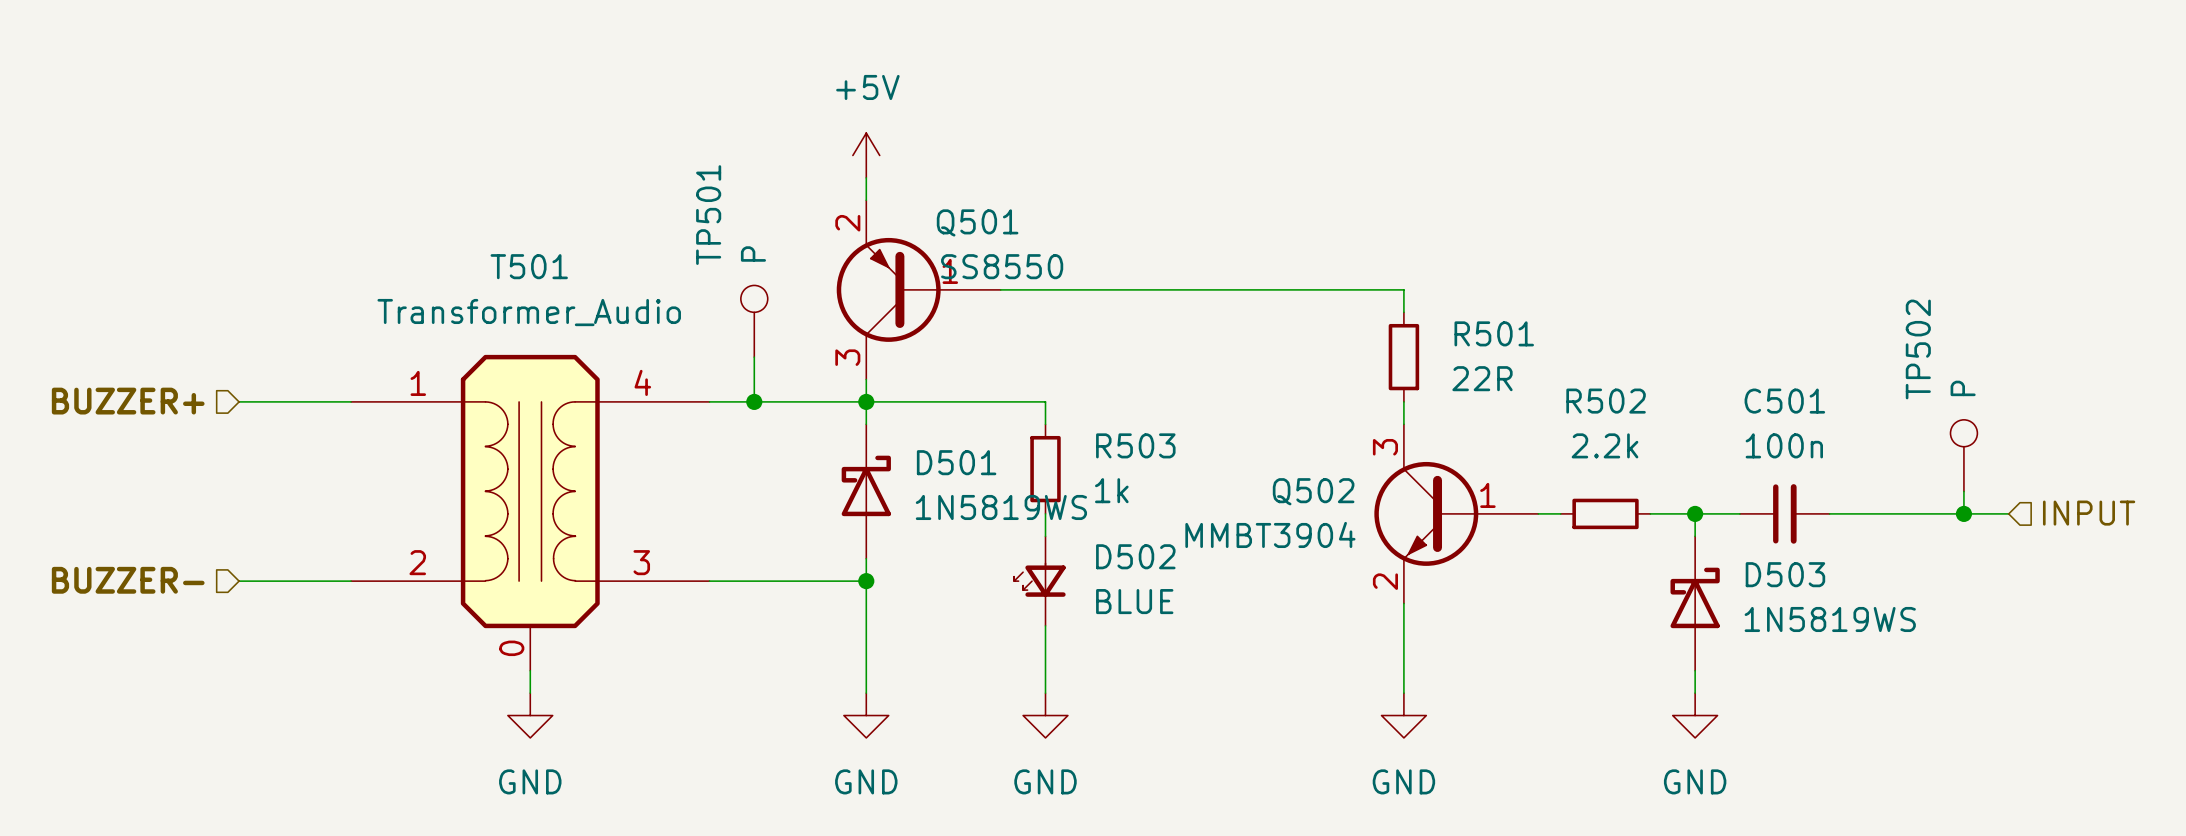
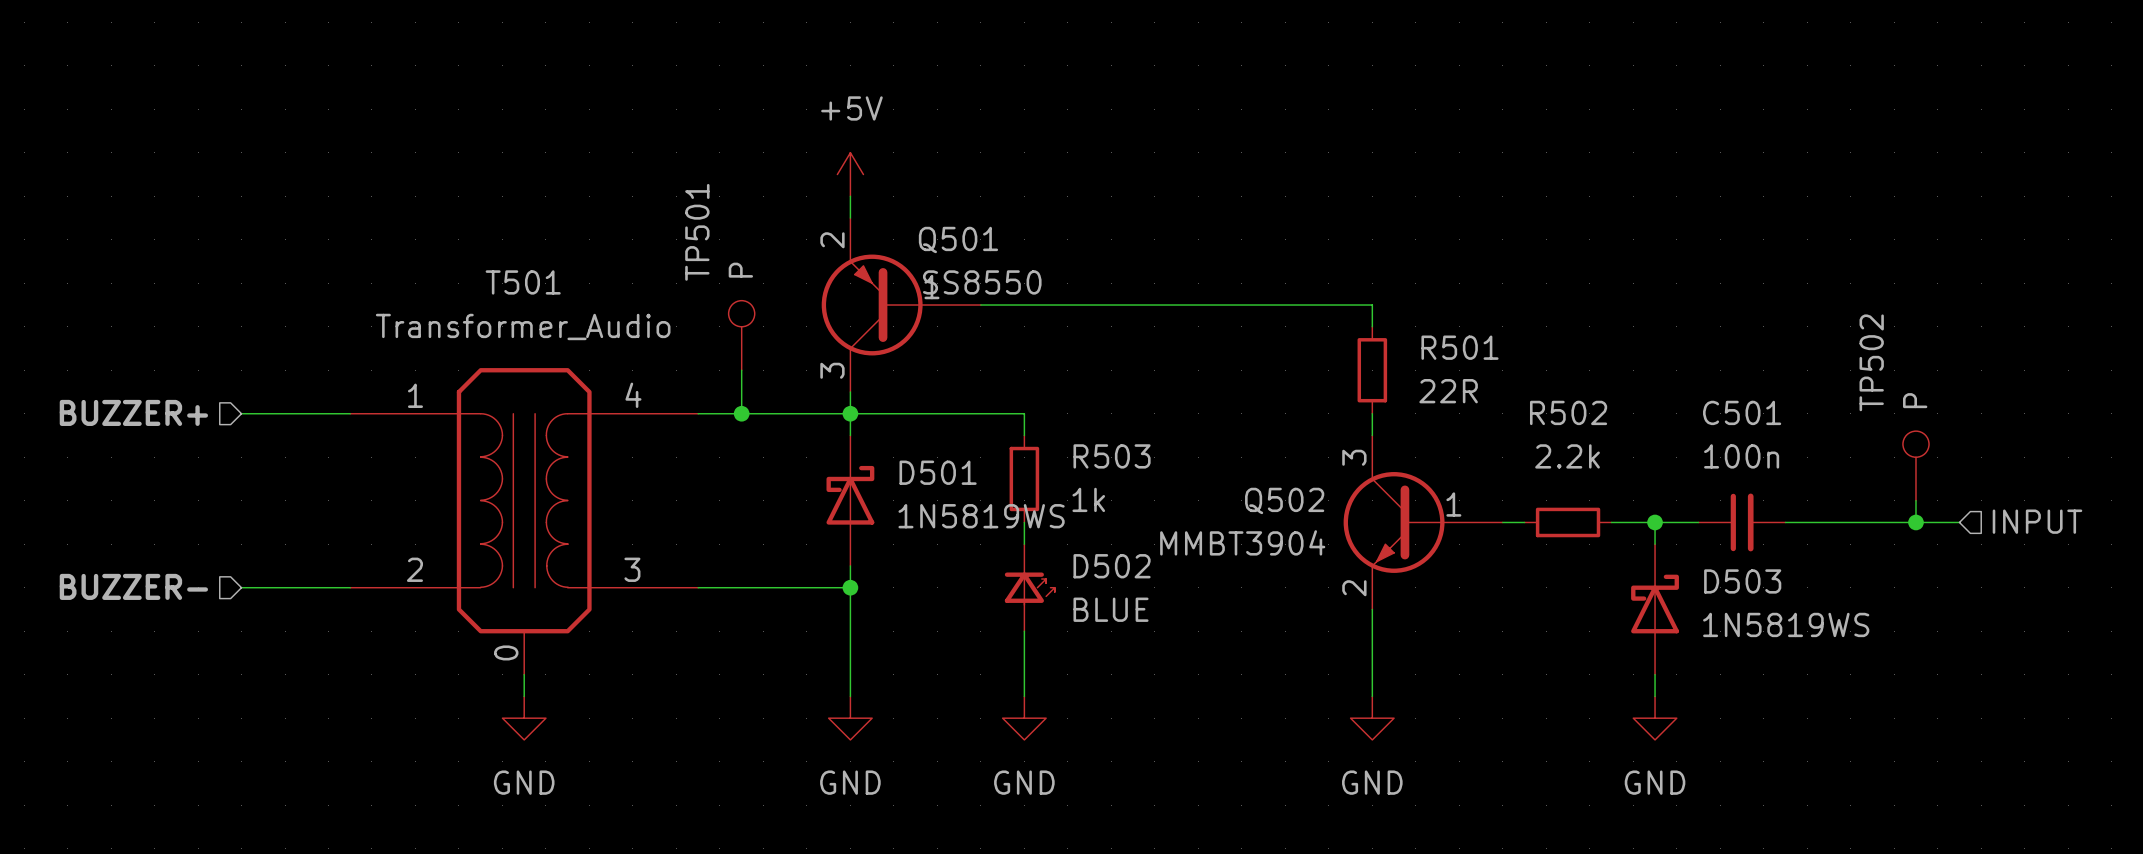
D502 rotation: 0° (1039, 580) -> 180° (1029, 588)

